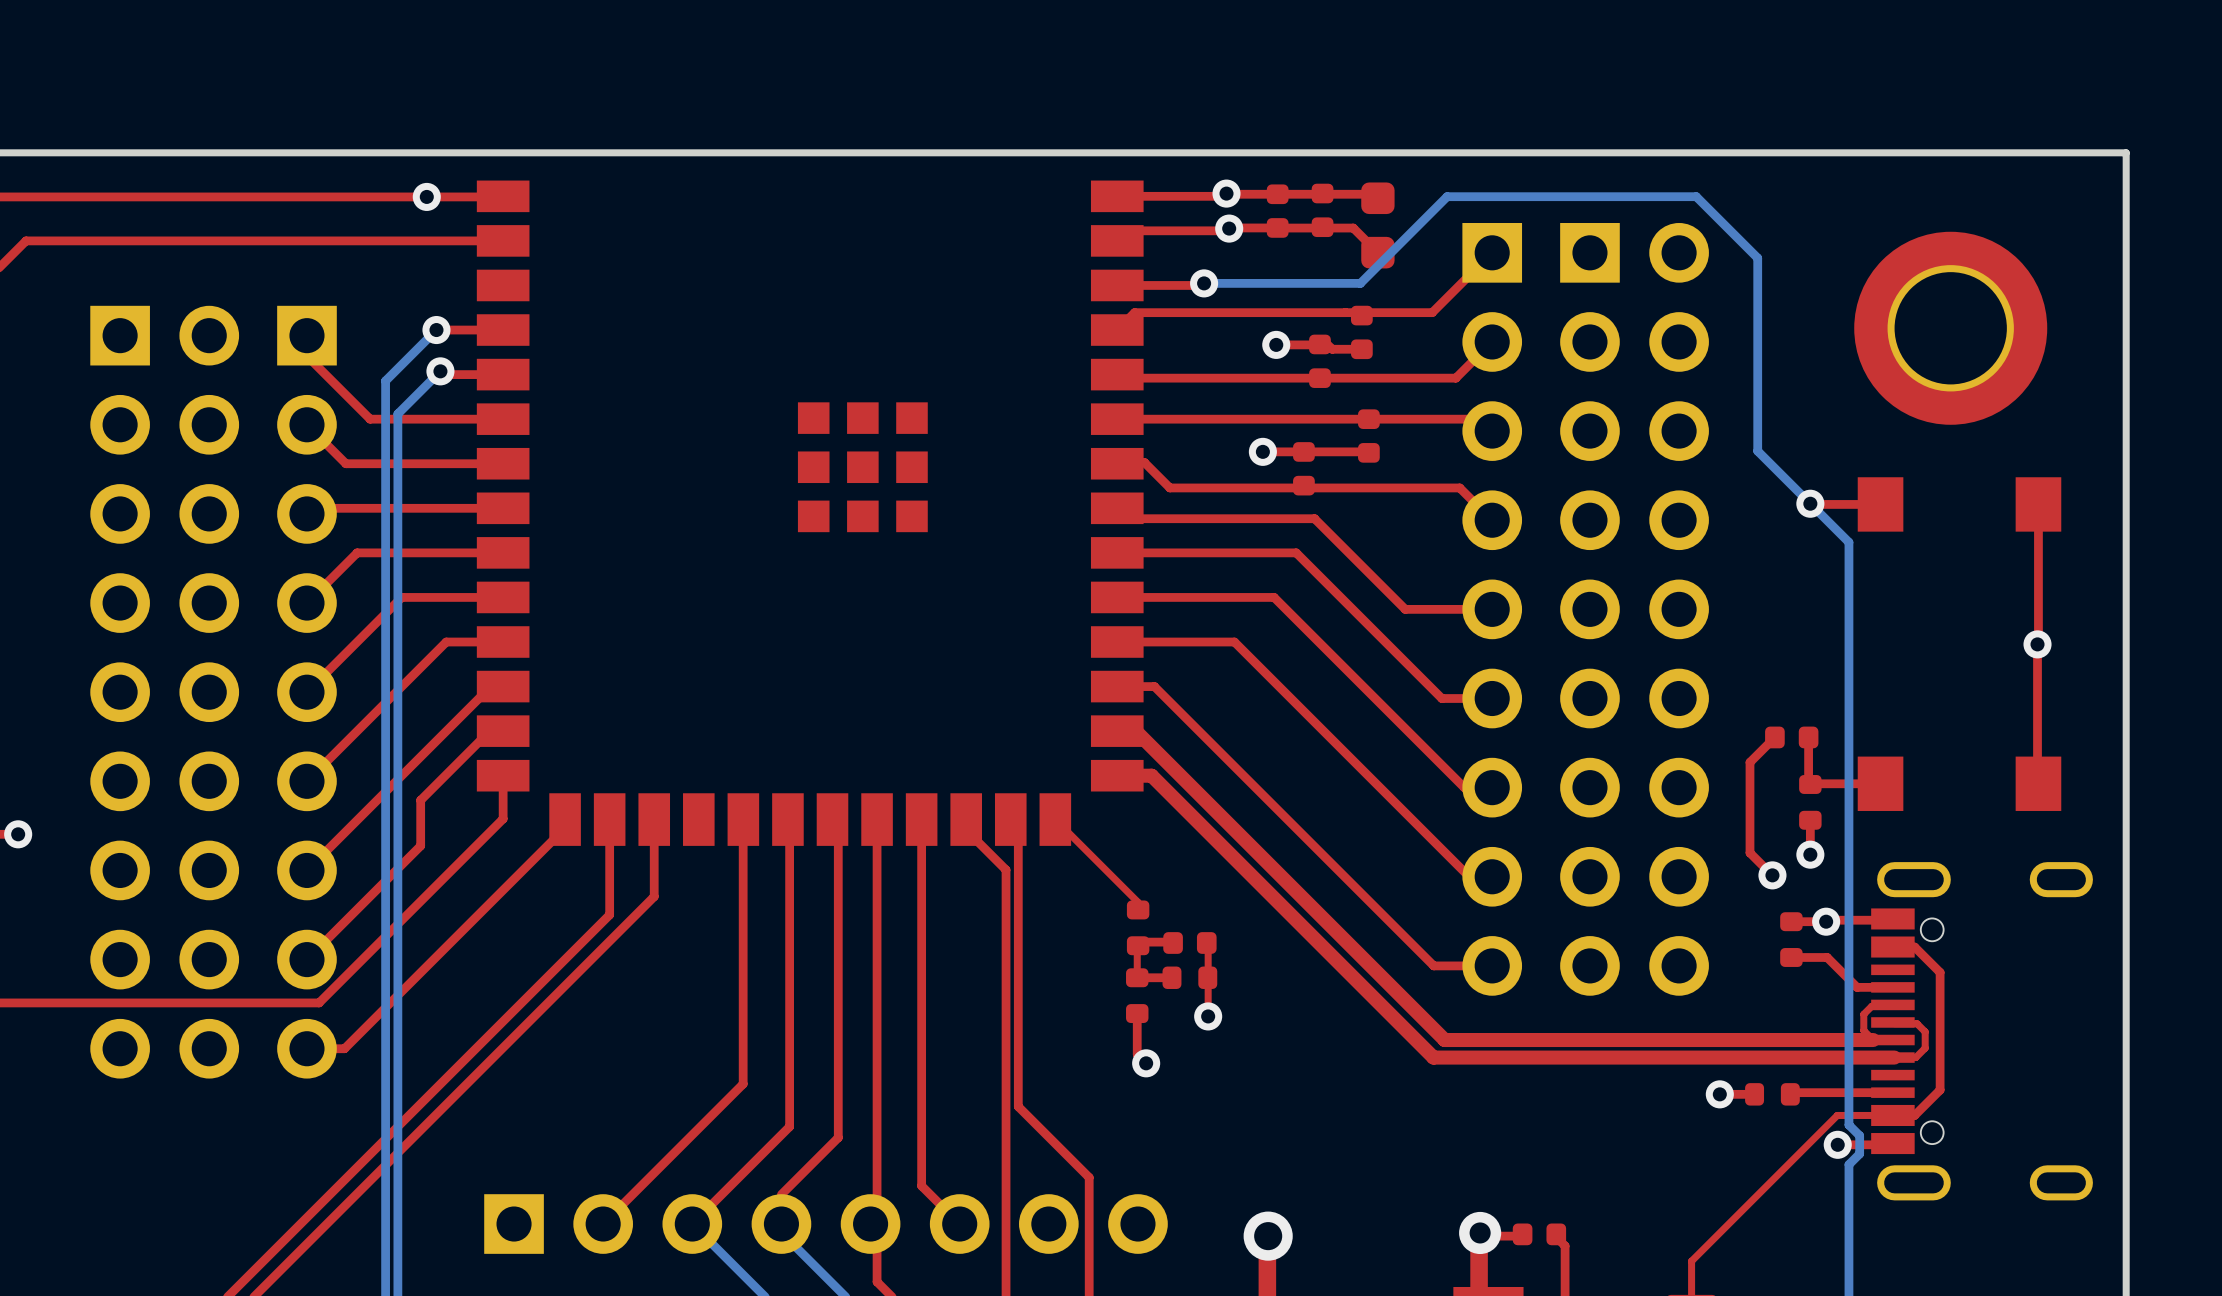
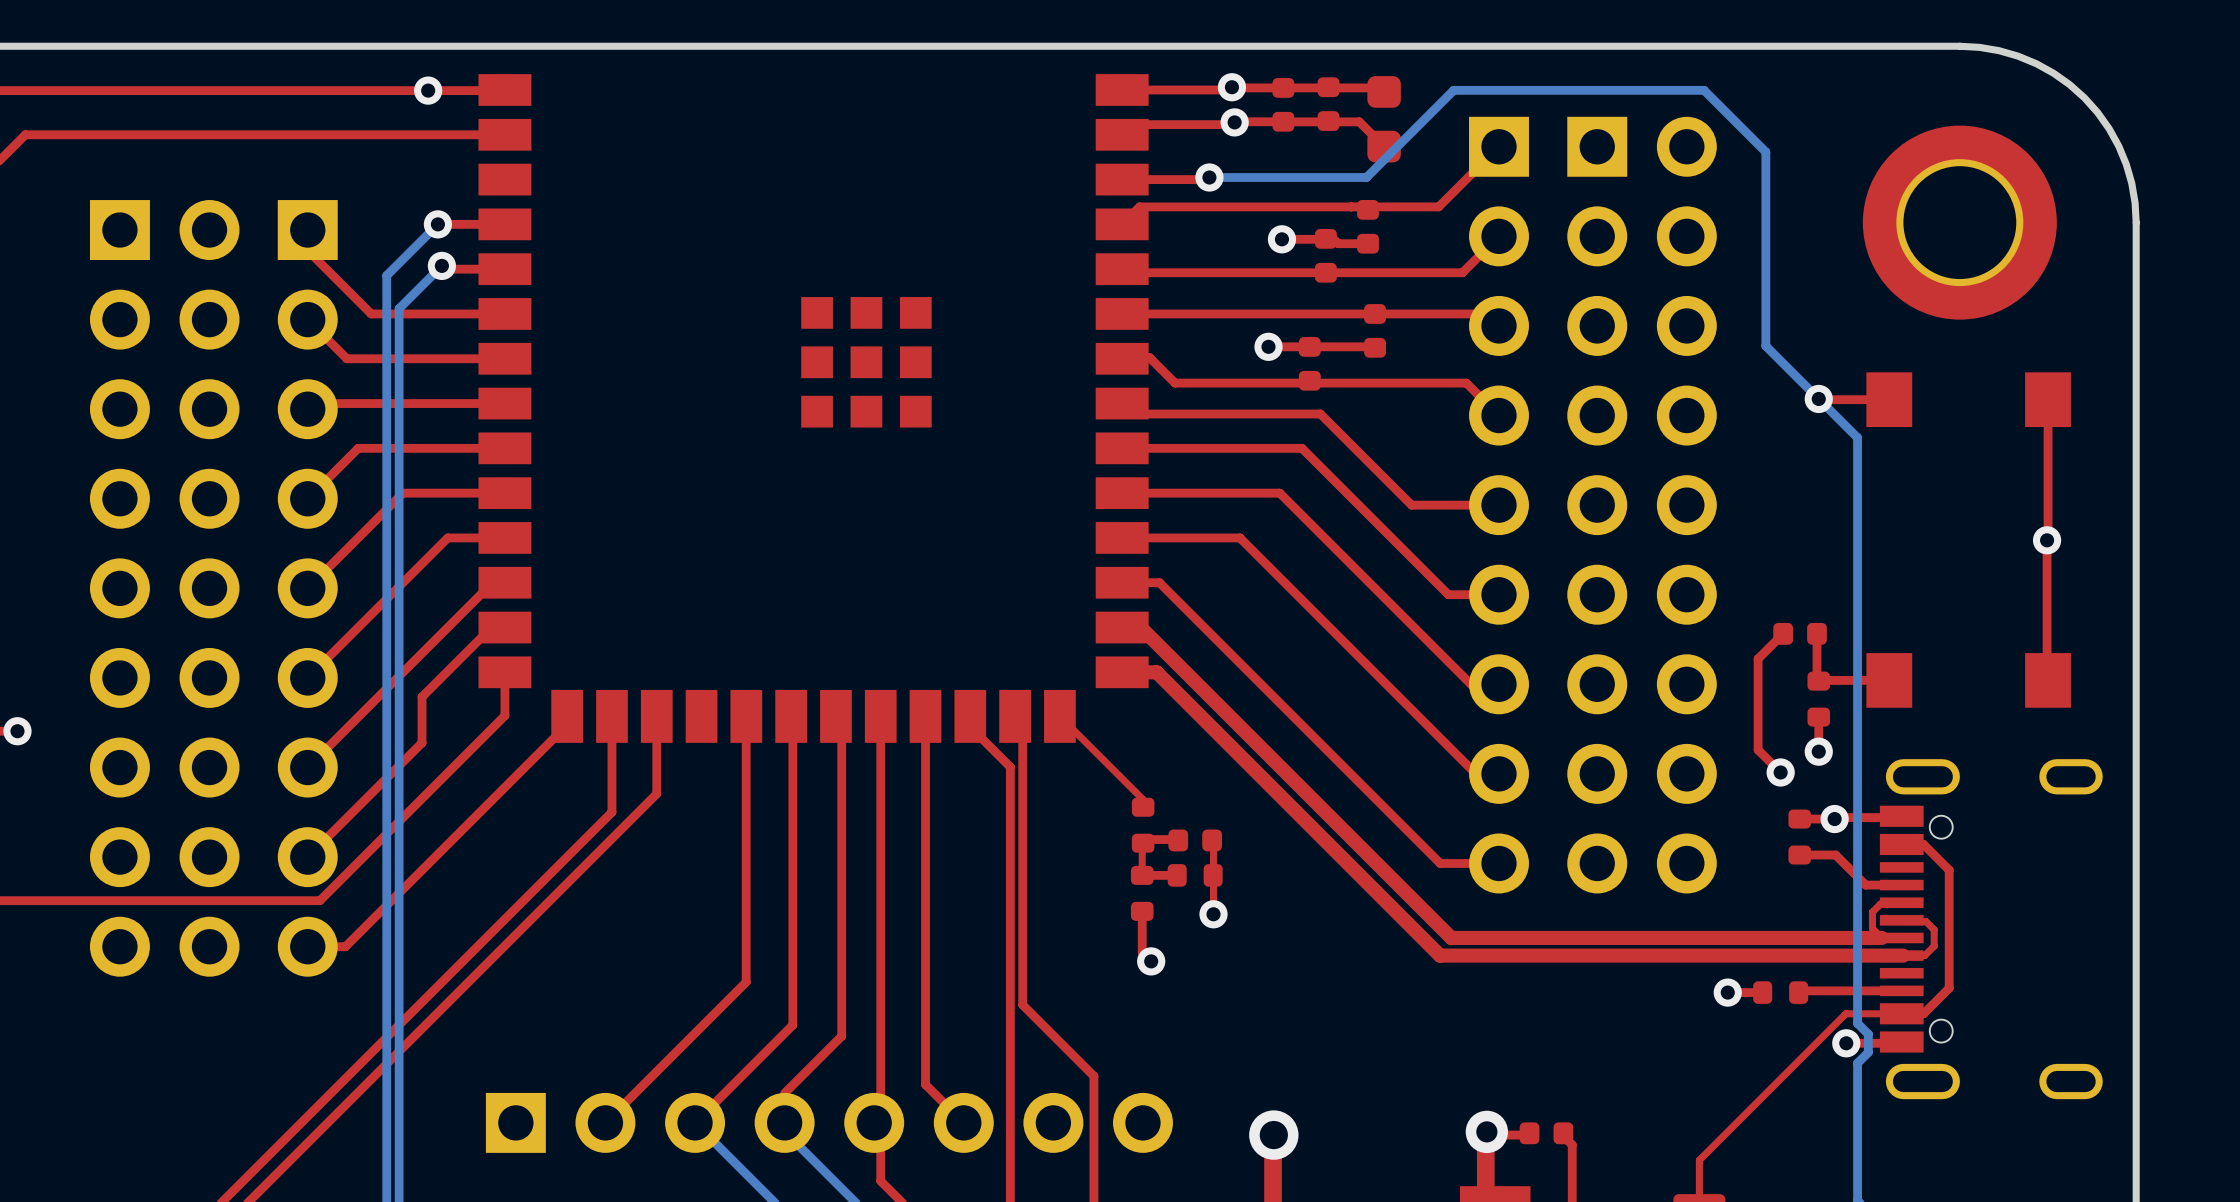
board edge: (1950, 152) (2126, 152) (2126, 328) -> (1959, 46) (1979, 47) (2018, 56) (2053, 73) (2084, 97) (2109, 128) (2118, 146) (2131, 183) (2136, 222)

